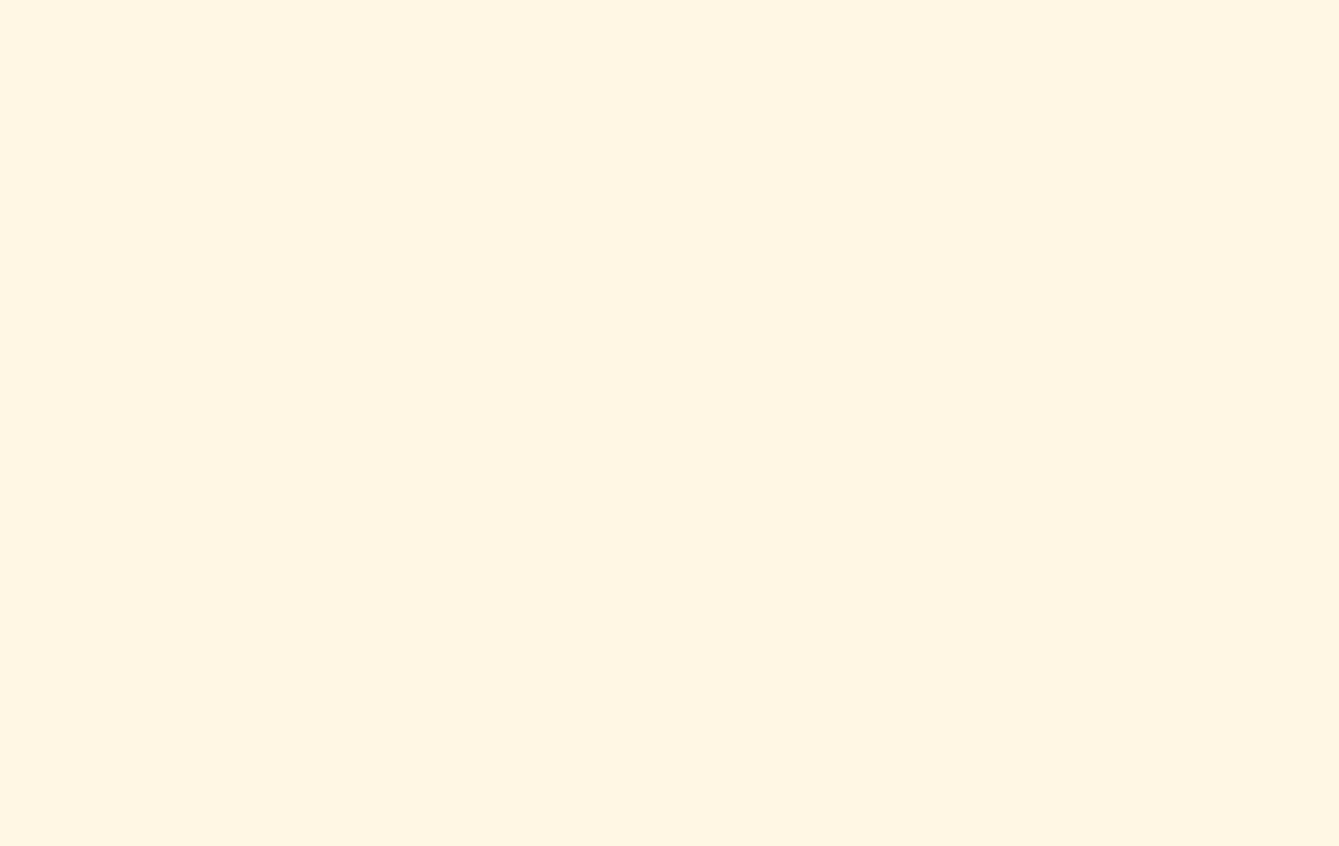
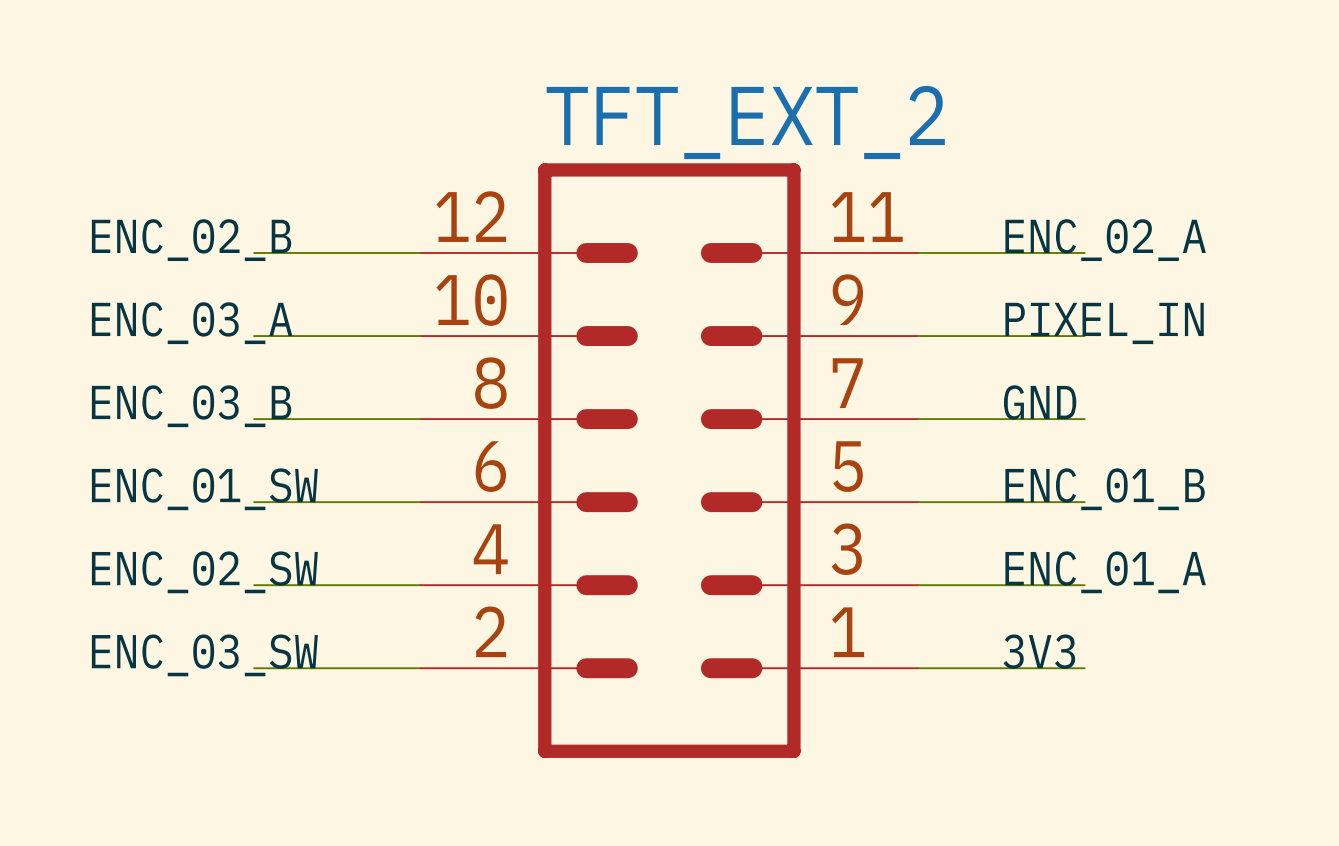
label: none -> ENC_02_B (191, 240)
label: none -> ENC_02_A (1105, 240)
wire: none -> (254, 252) (420, 252)
wire: none -> (918, 252) (1084, 252)
label: none -> ENC_03_A (192, 323)
label: none -> PIXEL_IN (1104, 323)
wire: none -> (254, 336) (420, 336)
wire: none -> (918, 336) (1084, 336)
label: none -> GND (1040, 402)
label: none -> ENC_03_B (191, 406)
wire: none -> (254, 419) (420, 419)
wire: none -> (918, 419) (1084, 419)
TFT_EXT_2: none -> (669, 460)
label: none -> ENC_01_SW (204, 489)
label: none -> ENC_01_B (1105, 489)
wire: none -> (254, 502) (420, 502)
wire: none -> (918, 502) (1084, 502)
label: none -> ENC_02_SW (204, 572)
label: none -> ENC_01_A (1105, 572)
wire: none -> (254, 585) (420, 585)
wire: none -> (918, 585) (1084, 585)
label: none -> 3V3 (1039, 651)
label: none -> ENC_03_SW (204, 655)
wire: none -> (254, 668) (420, 668)
wire: none -> (918, 668) (1084, 668)

